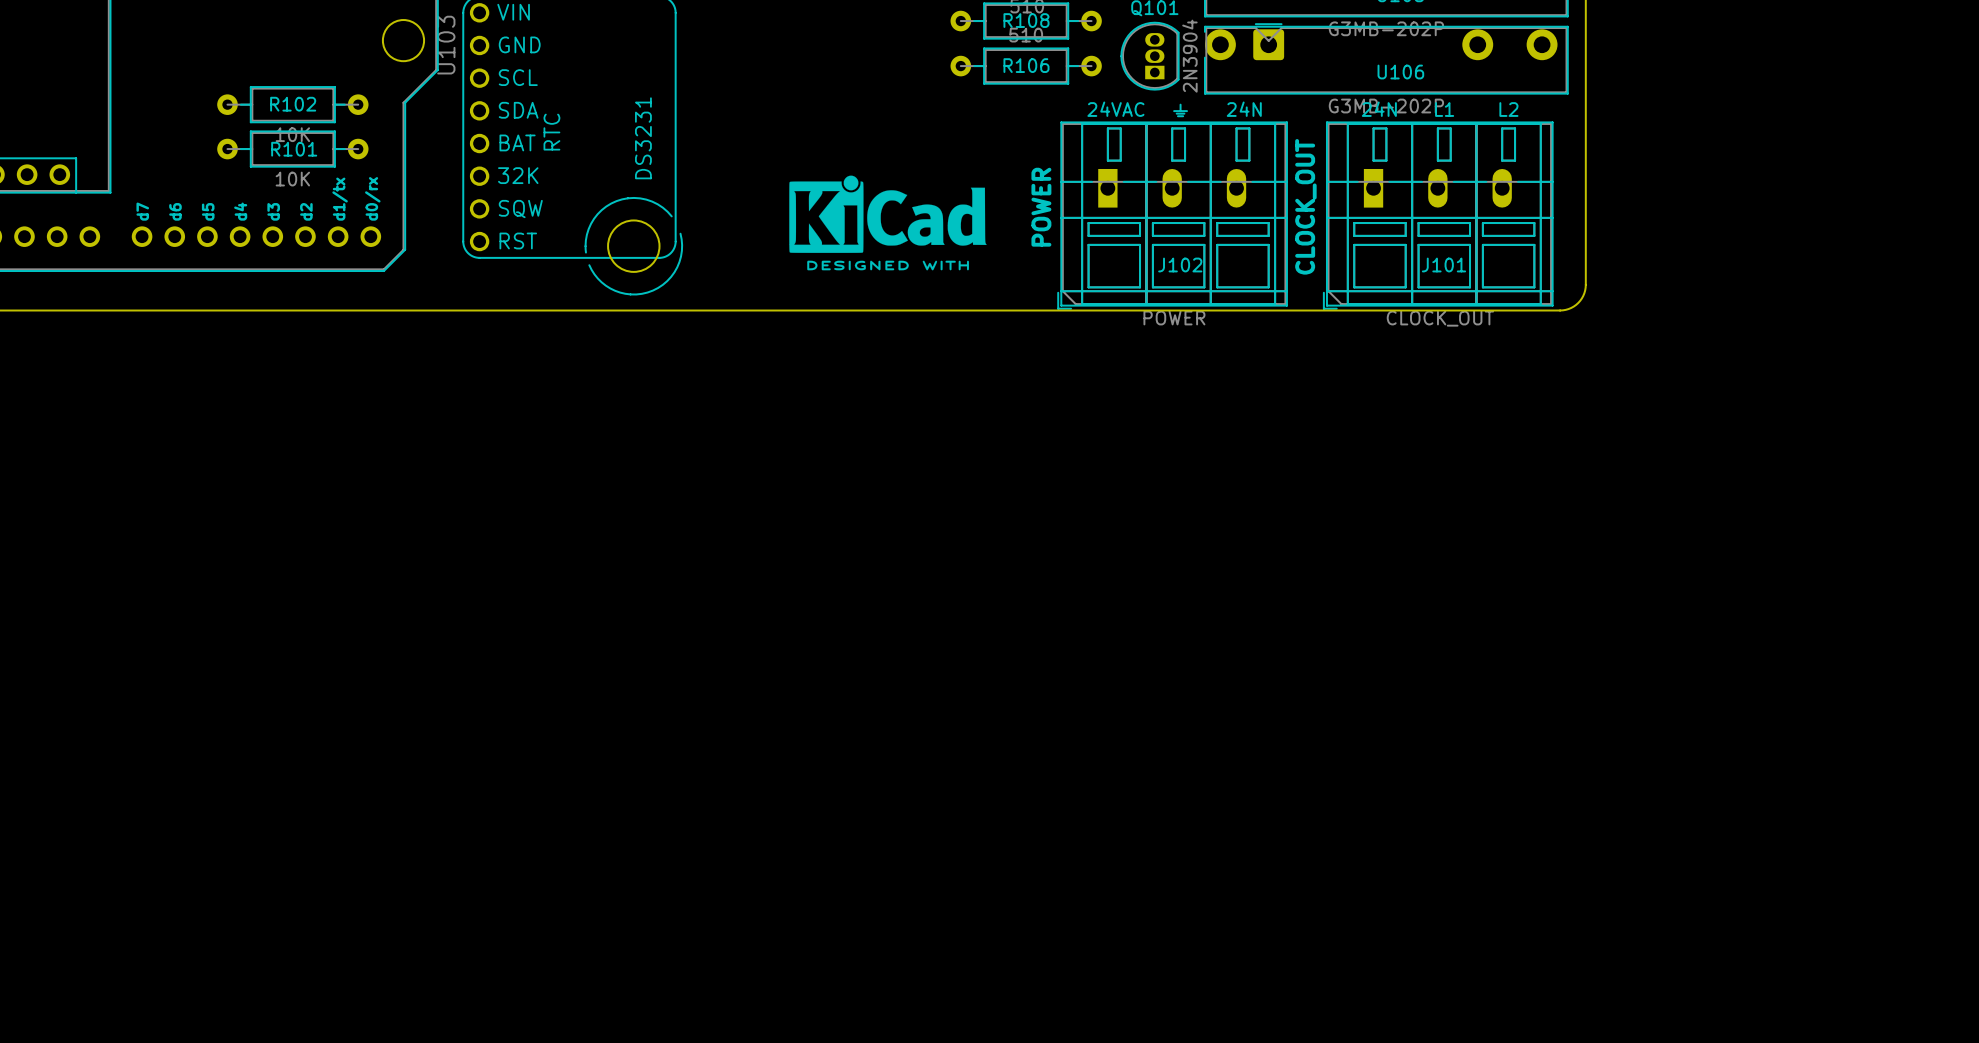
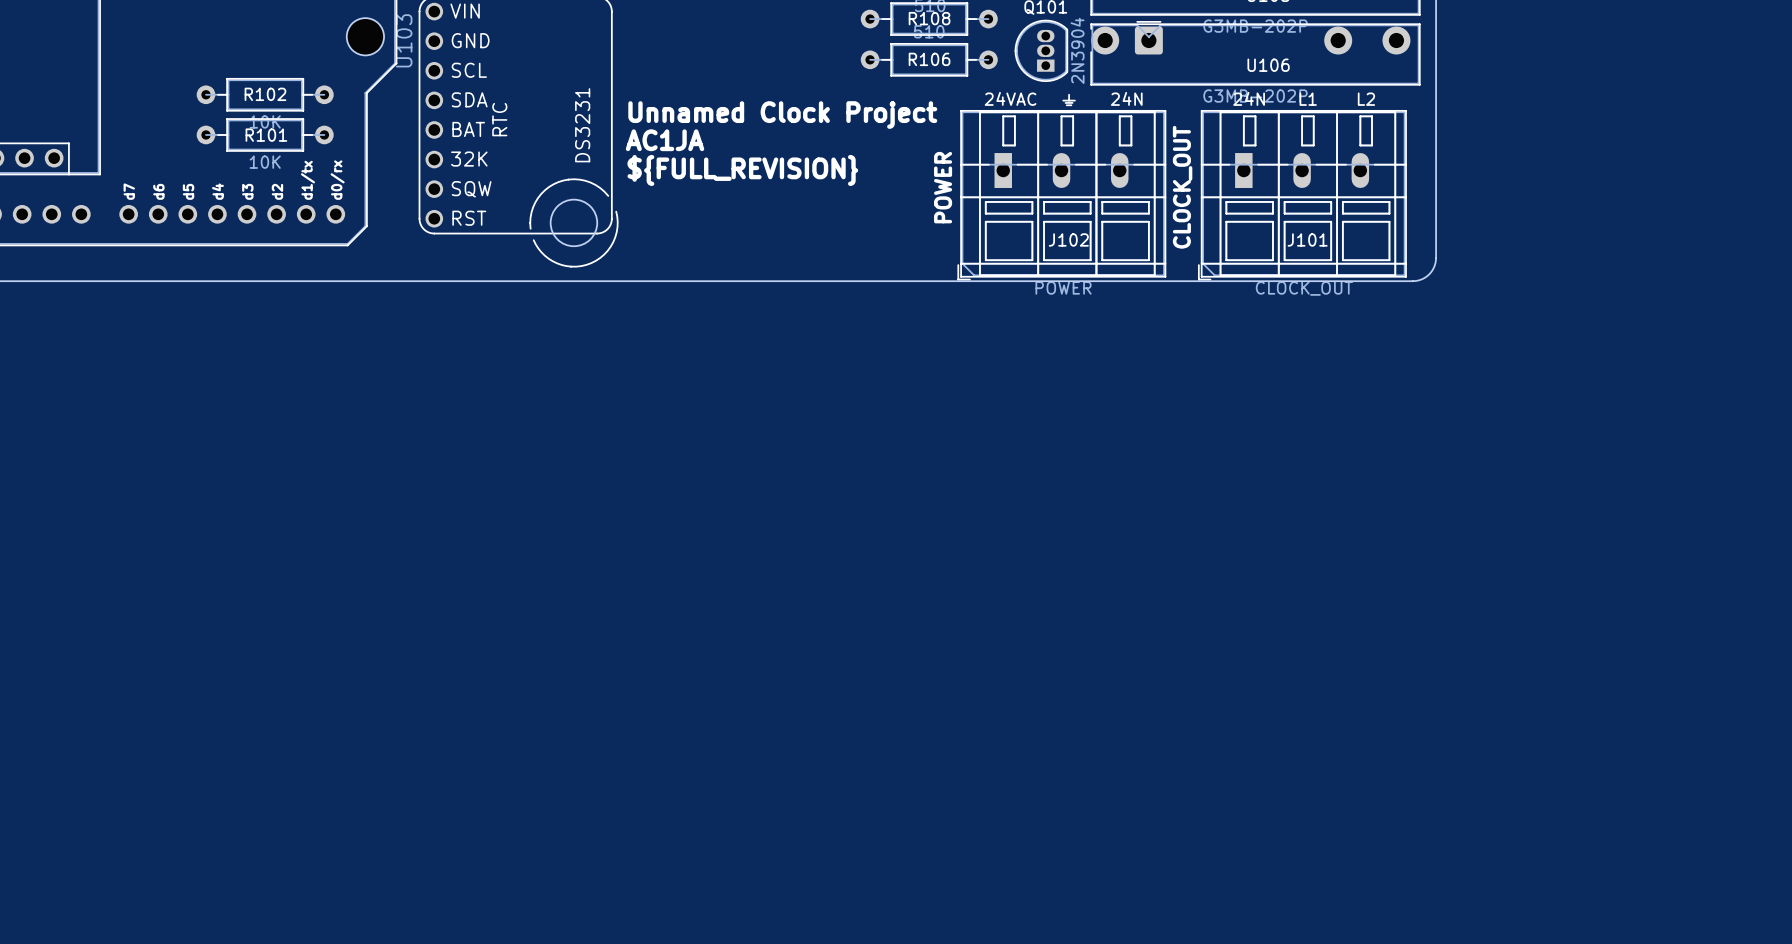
text: none -> Unnamed Clock Project (782, 115)
text: none -> AC1JA (665, 140)
drawing: [789, 175, 987, 271] -> none
text: none -> ${FULL_REVISION} (742, 170)

